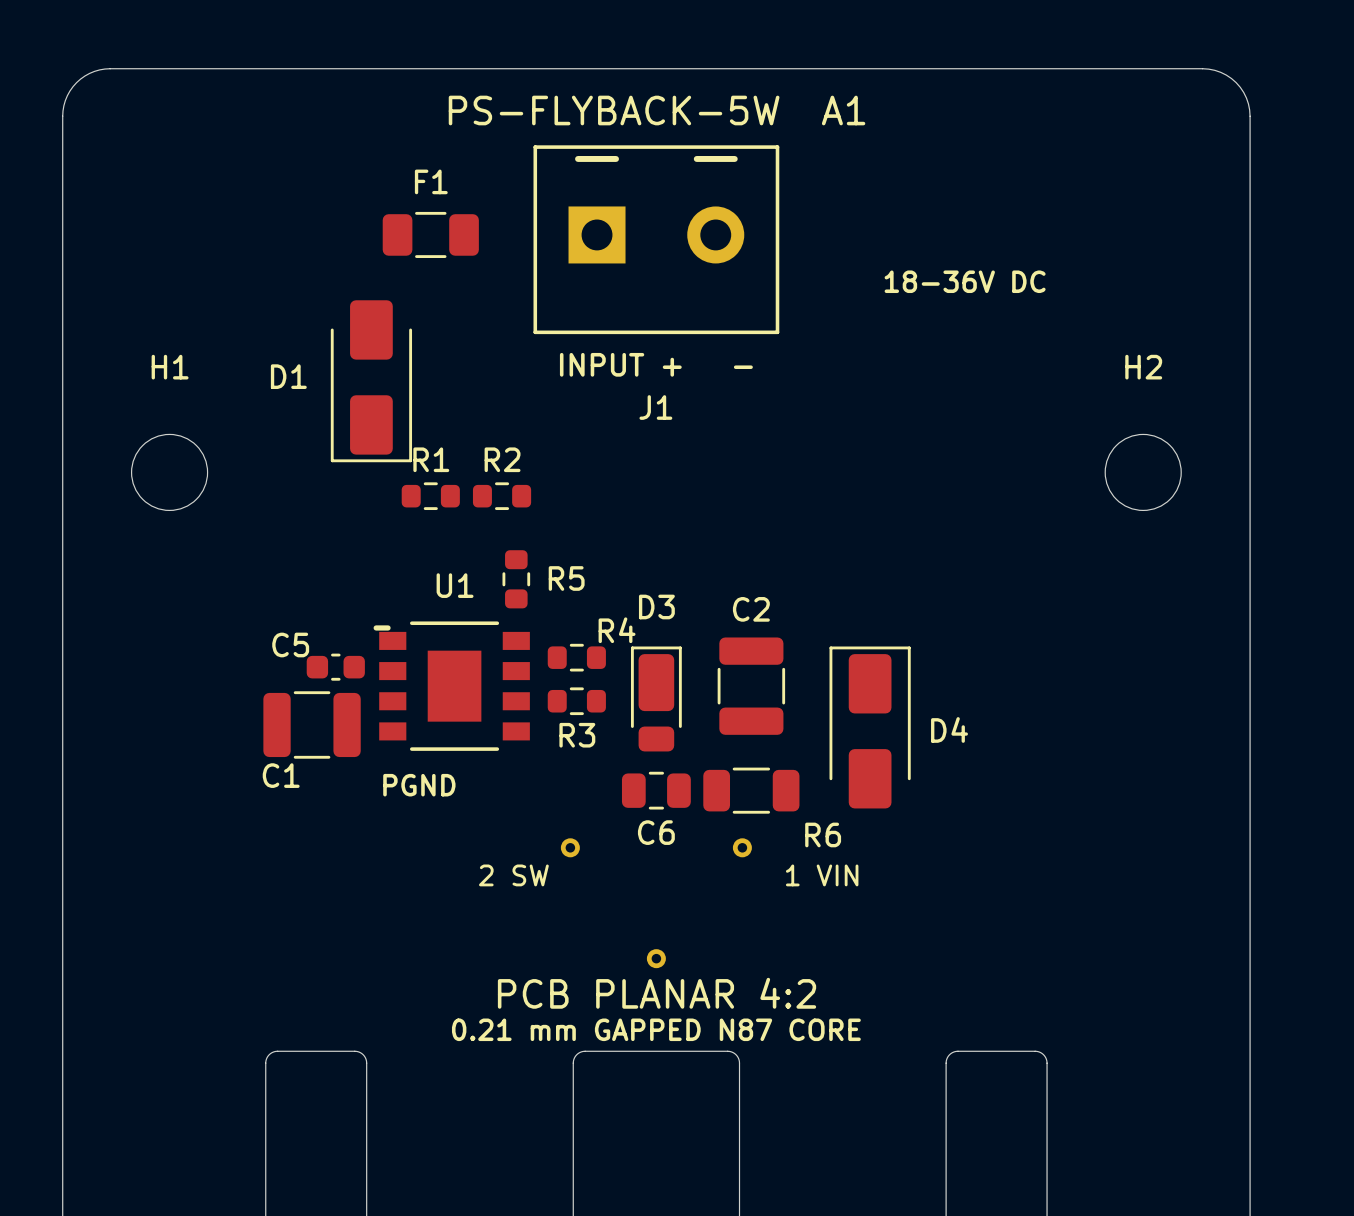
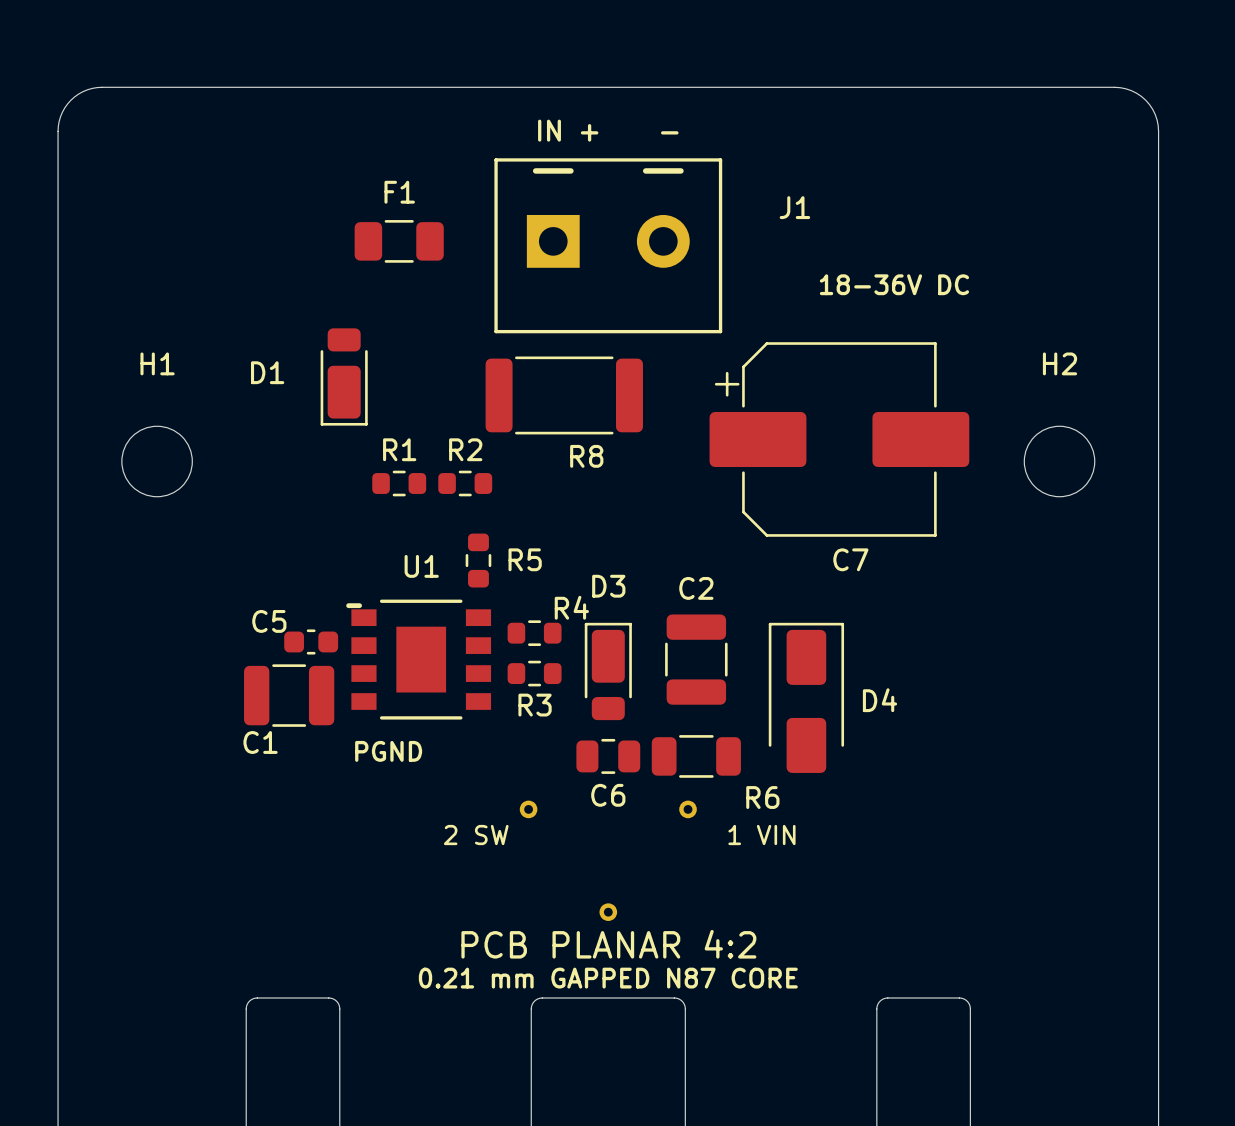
text: PS-FLYBACK-5W A1 (657, 110) -> IN + - (608, 130)
D1 footprint: [330, 300, 413, 463] -> [320, 328, 368, 426]
text: INPUT + - (656, 364) -> none
R8: none -> (564, 395)
J1 name position: J1 (655, 407) -> J1 (794, 207)
C7: none -> (839, 439)

